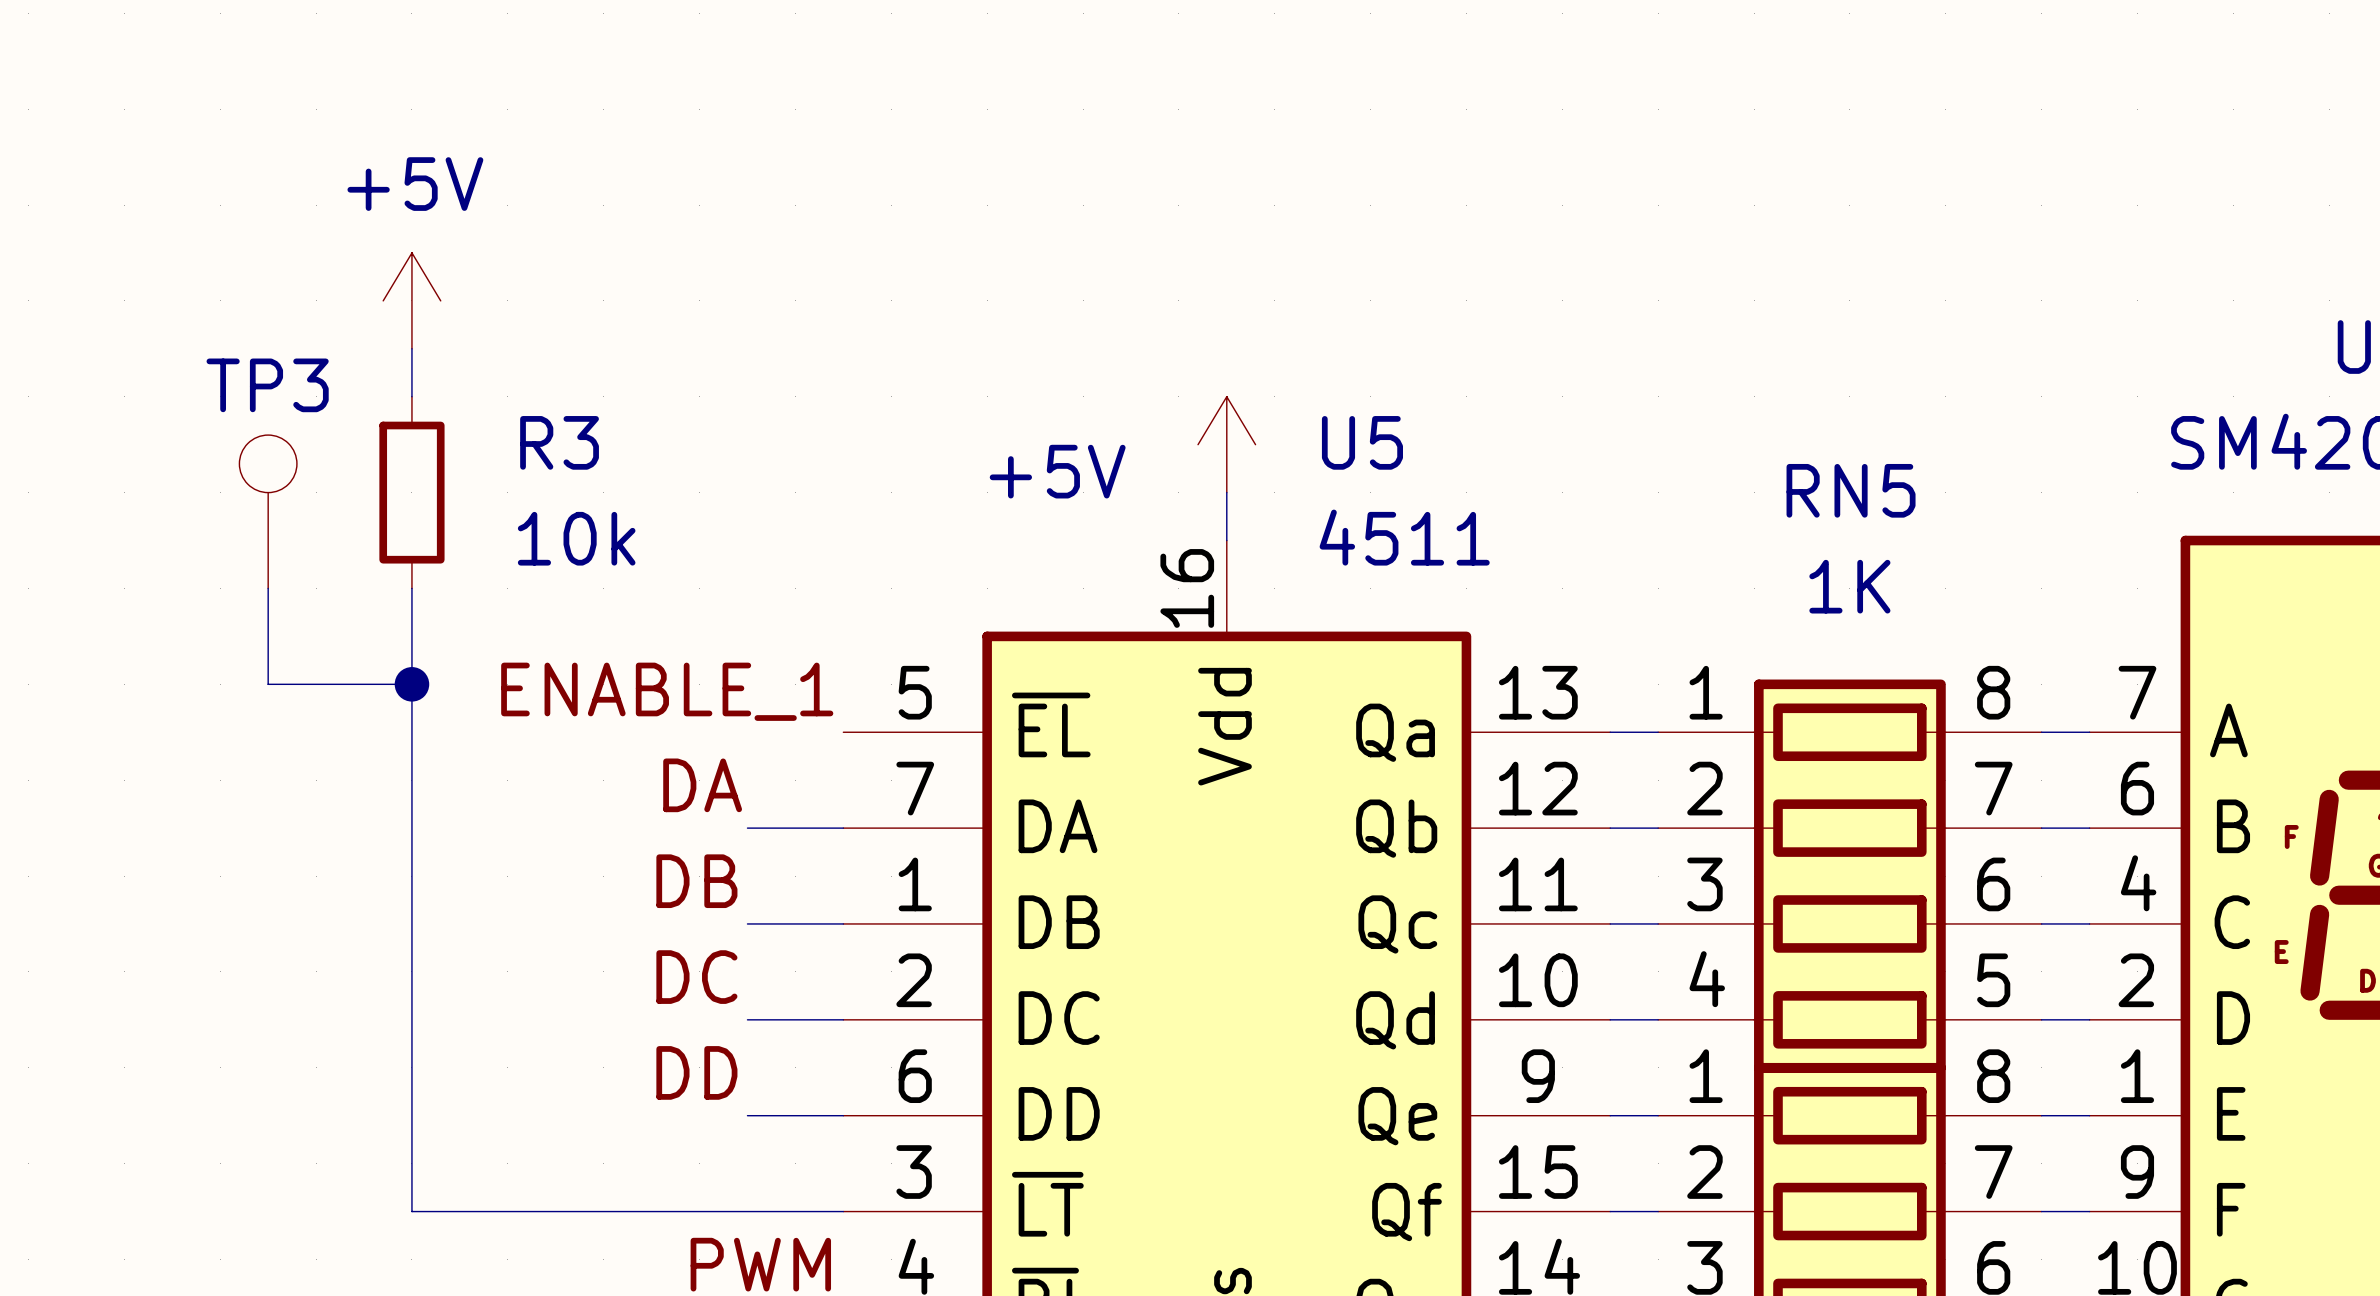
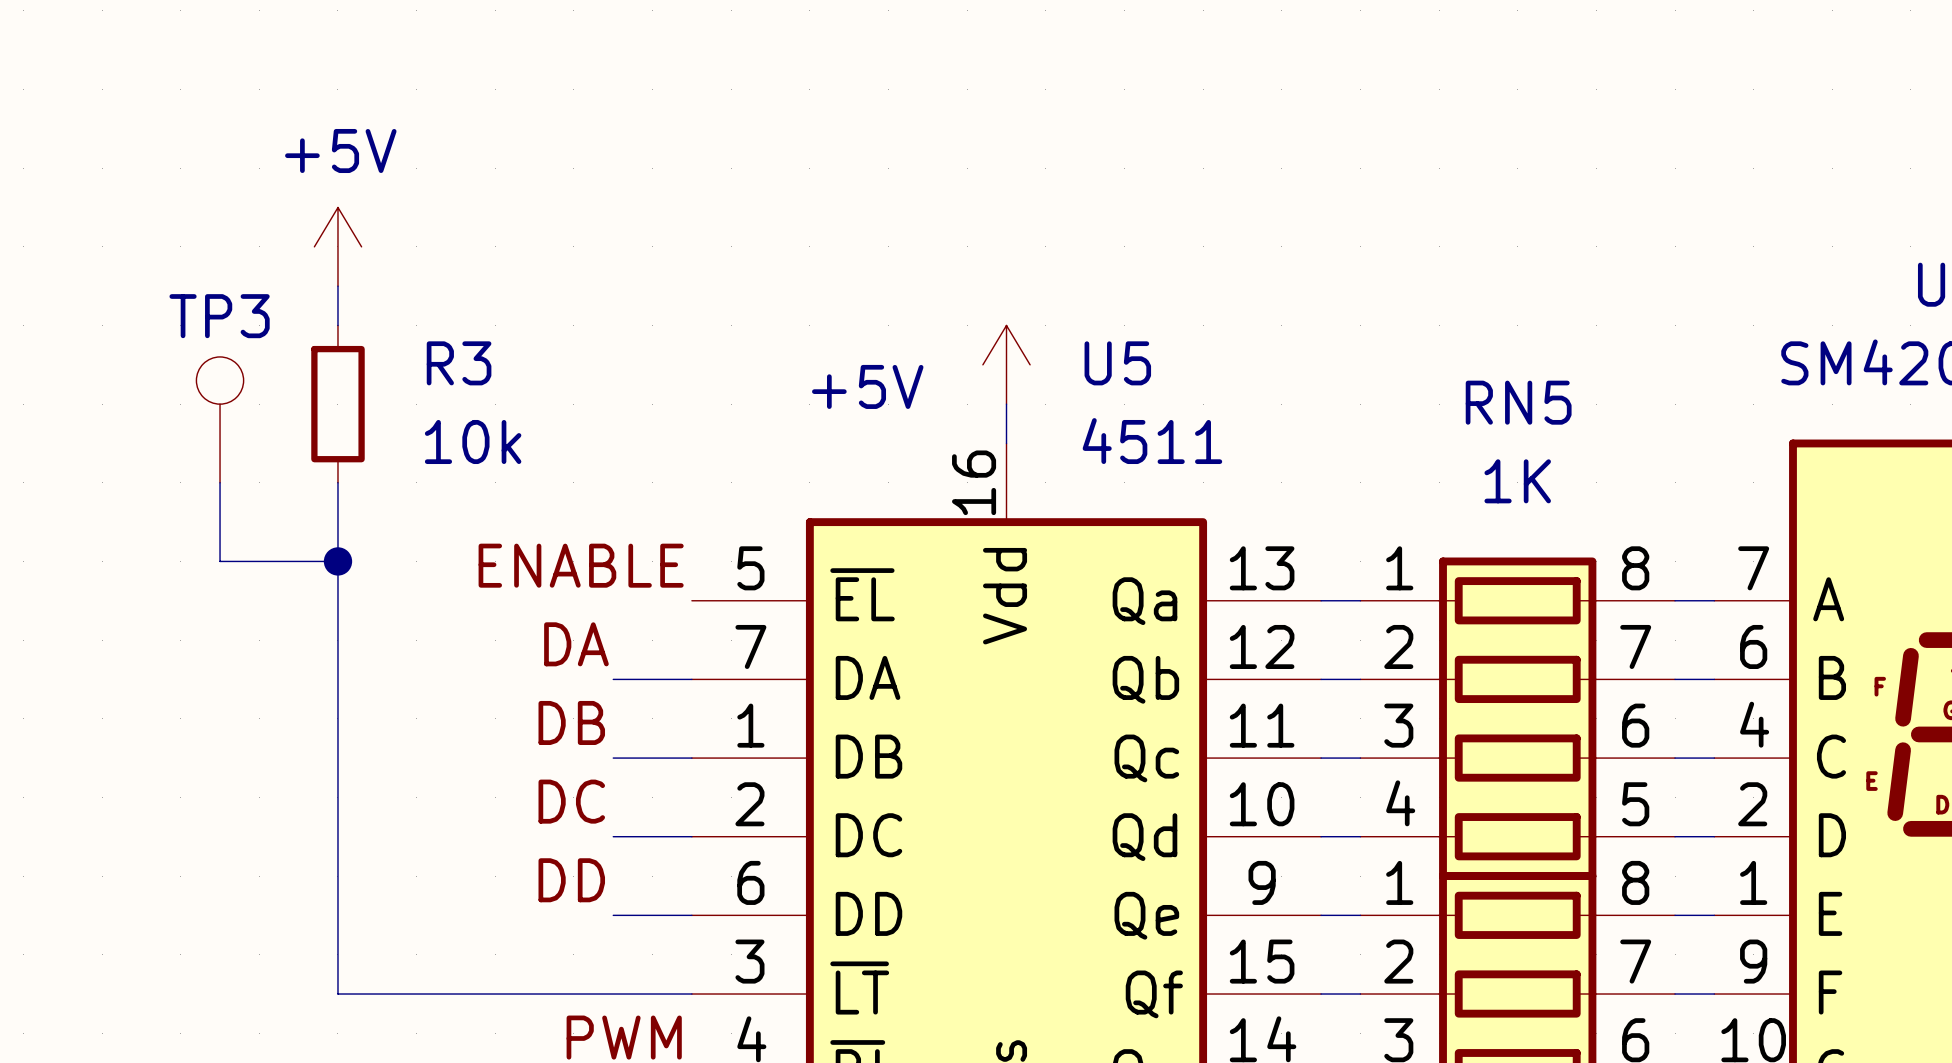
label: ENABLE_1 (667, 691) -> ENABLE (581, 565)

